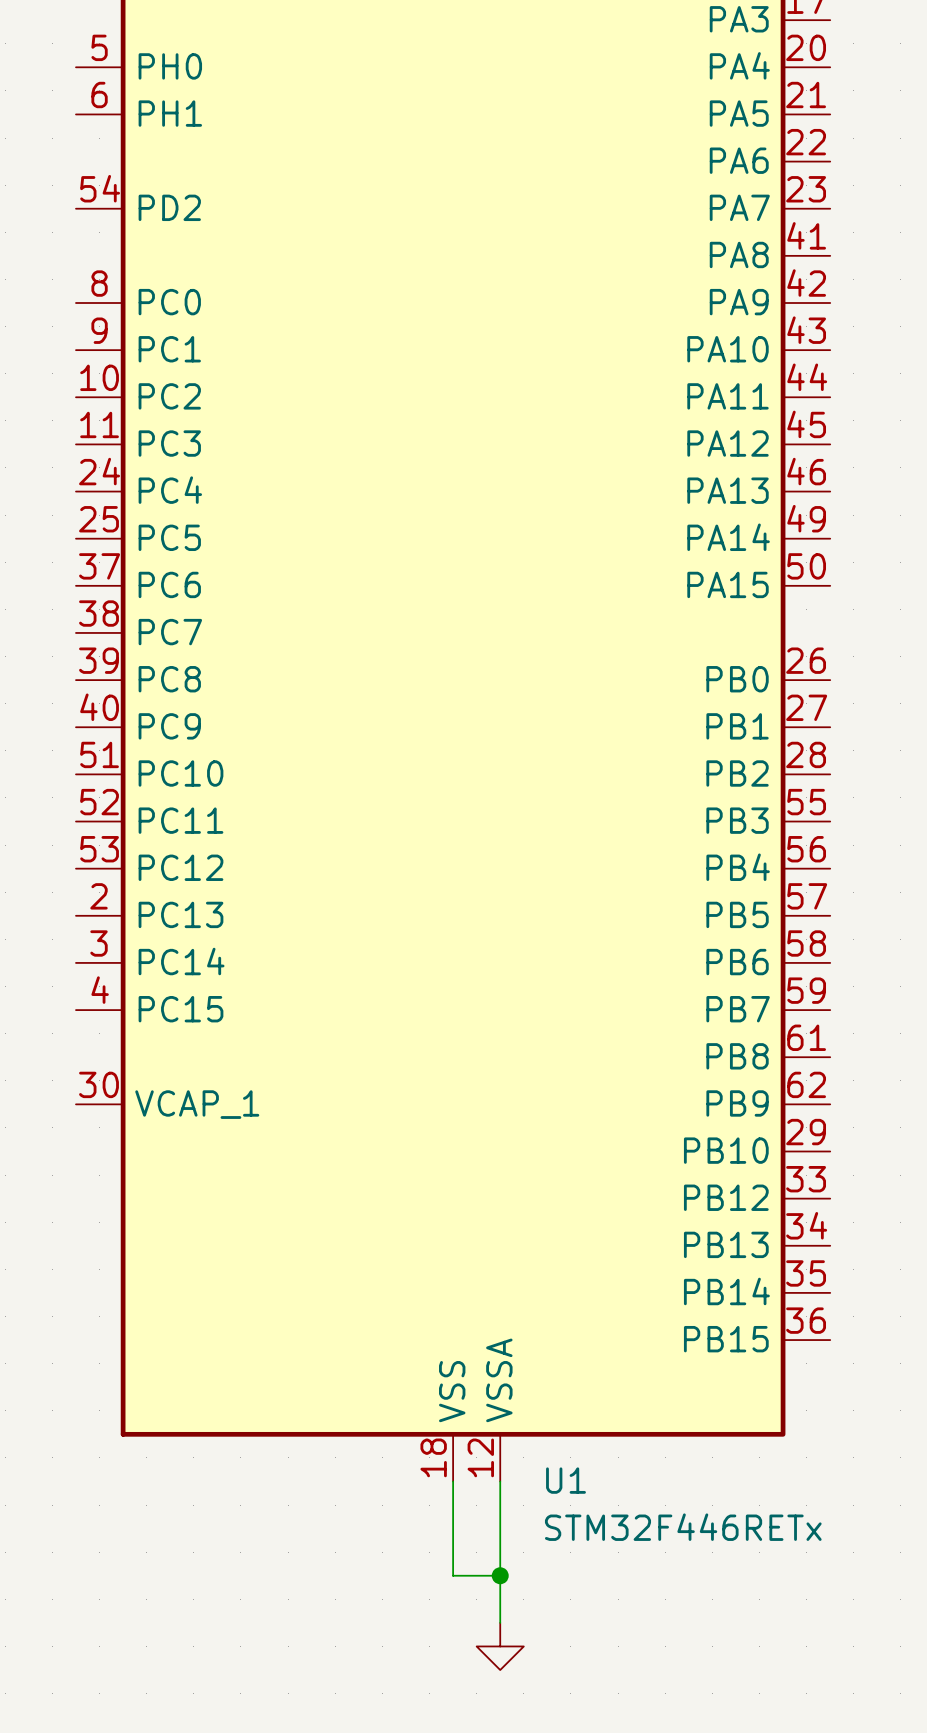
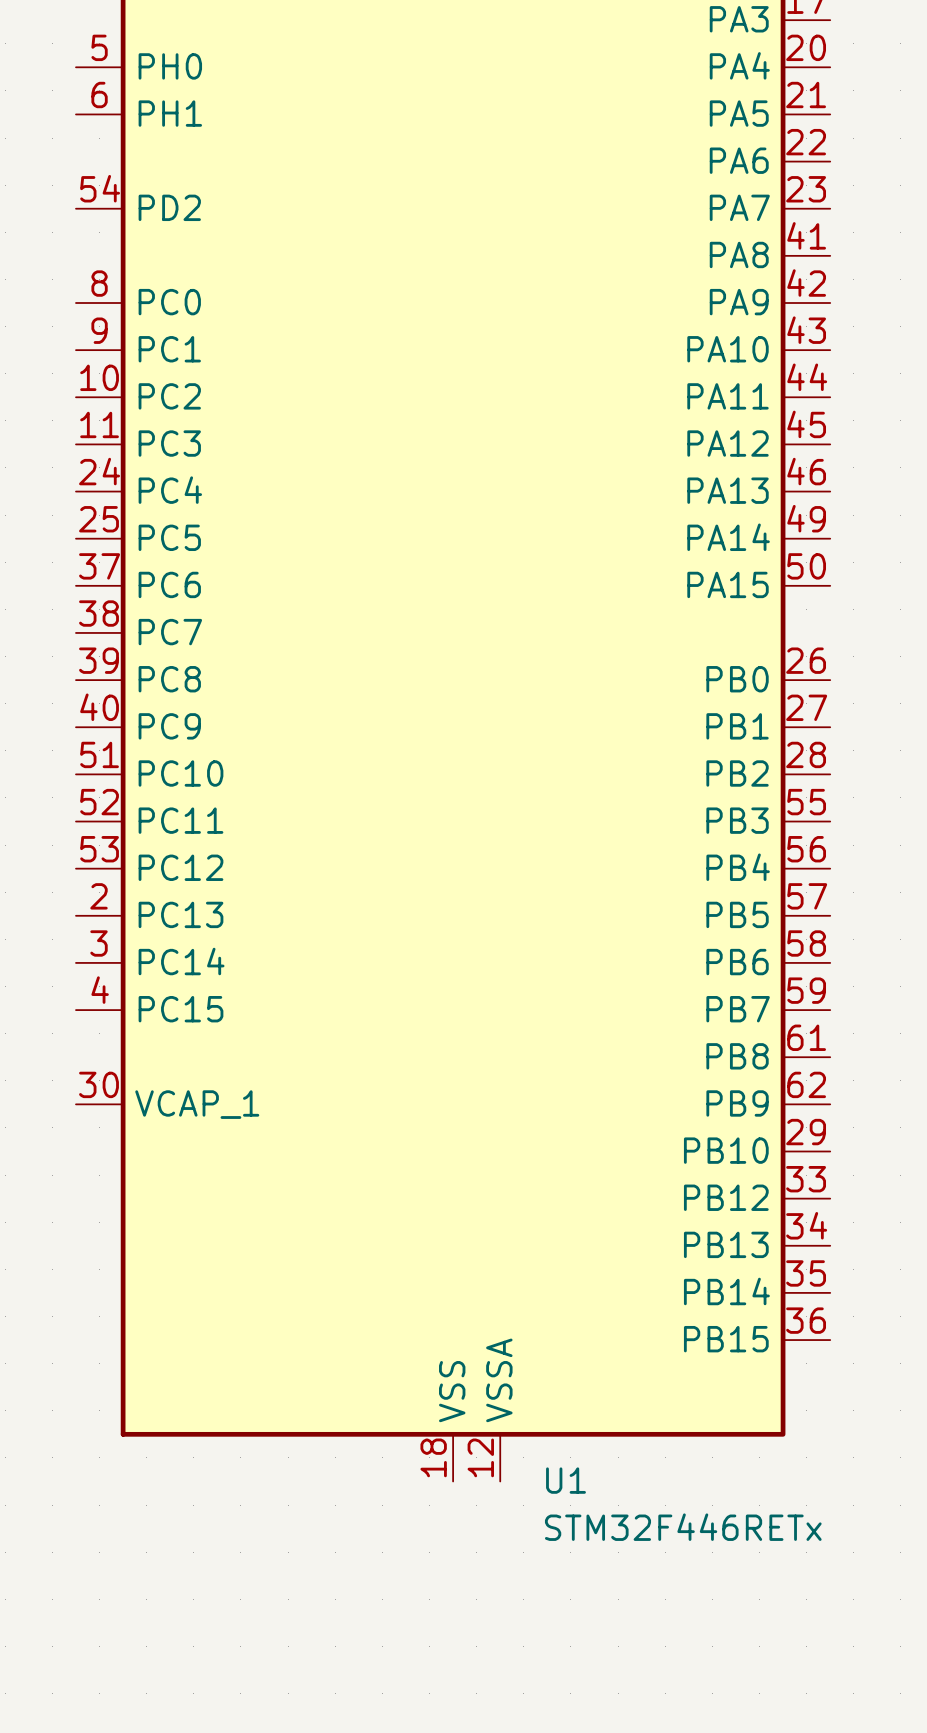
wire: (453, 1481) (453, 1575) (500, 1575) -> none
wire: (500, 1481) (500, 1622) -> none
junction: (500, 1575) -> none
power symbol: (500, 1646) -> none

